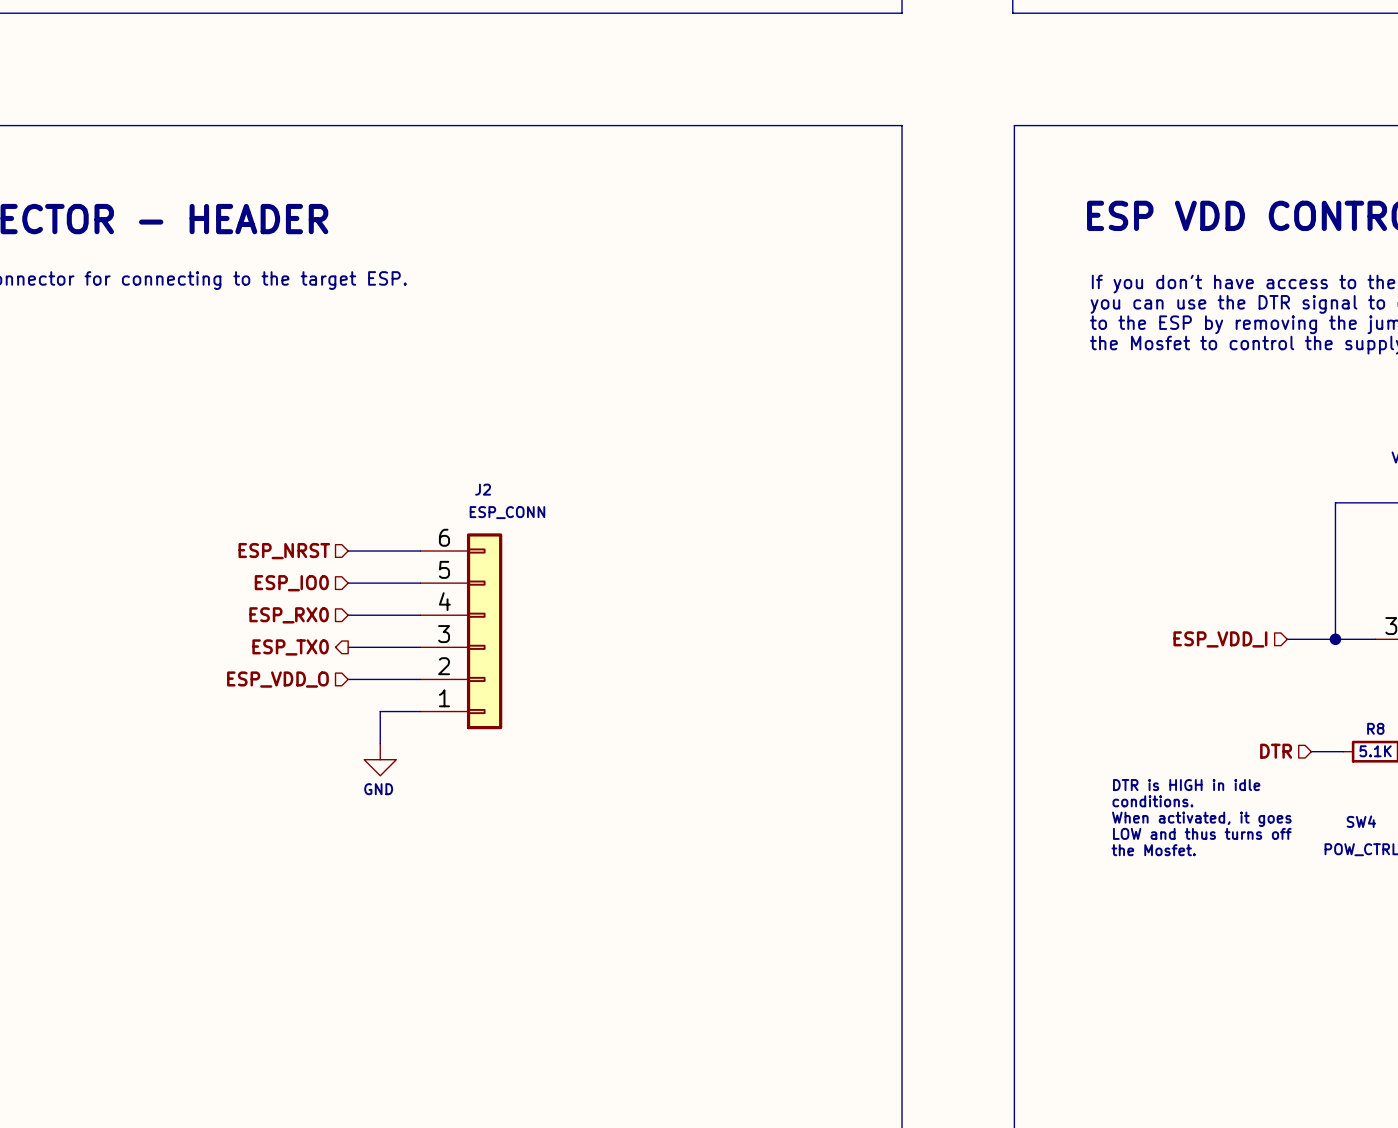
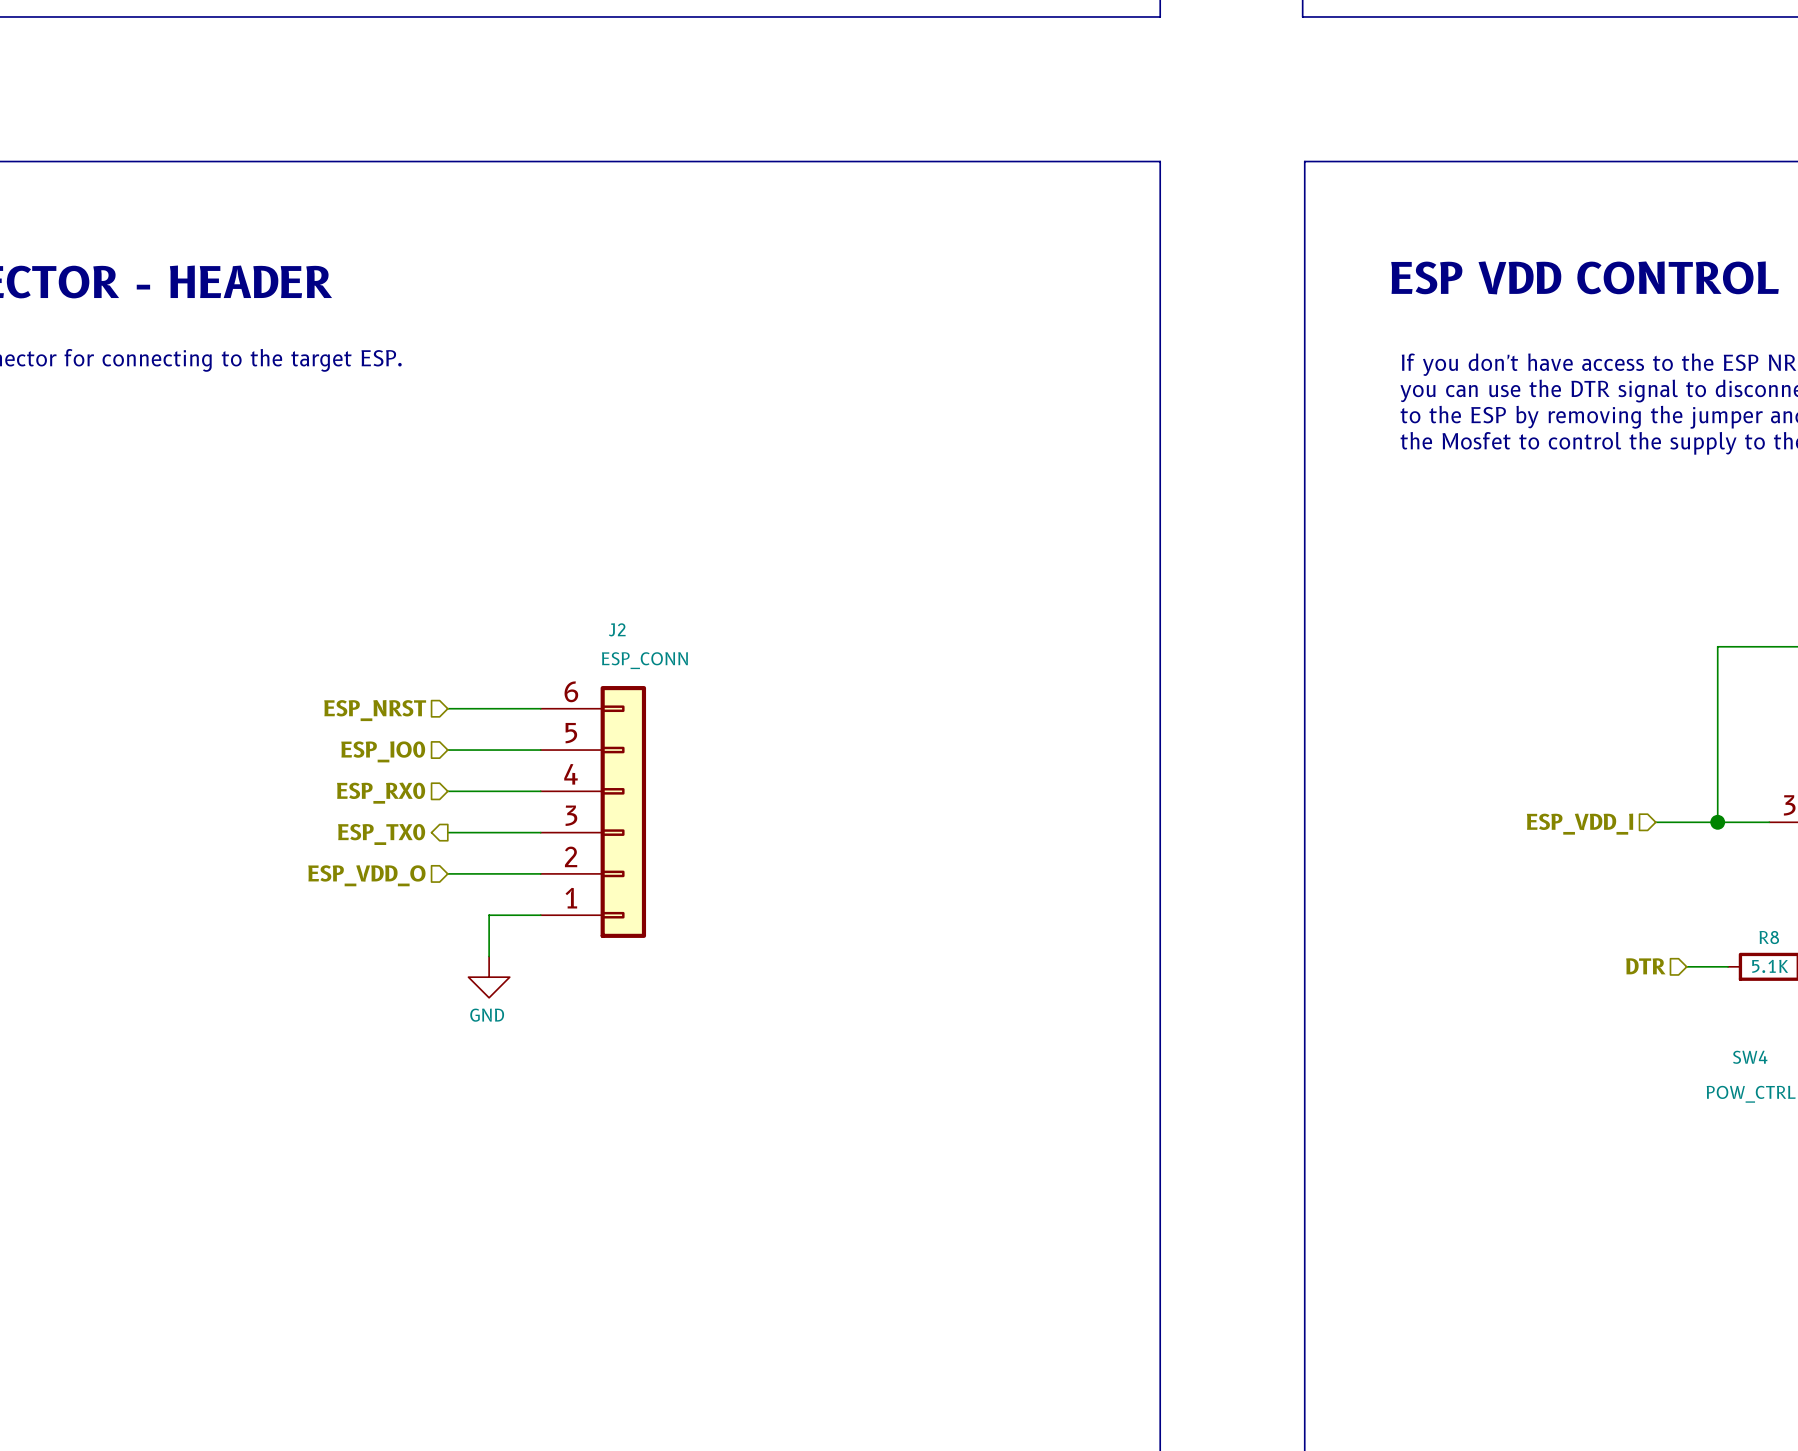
text: DTR is HIGH in idle (1186, 785) -> none
text: conditions. (1152, 801) -> none
text: When activated, it goes (1201, 819) -> none
text: LOW and thus turns off (1202, 833) -> none
text: the Mosfet. (1153, 850) -> none

